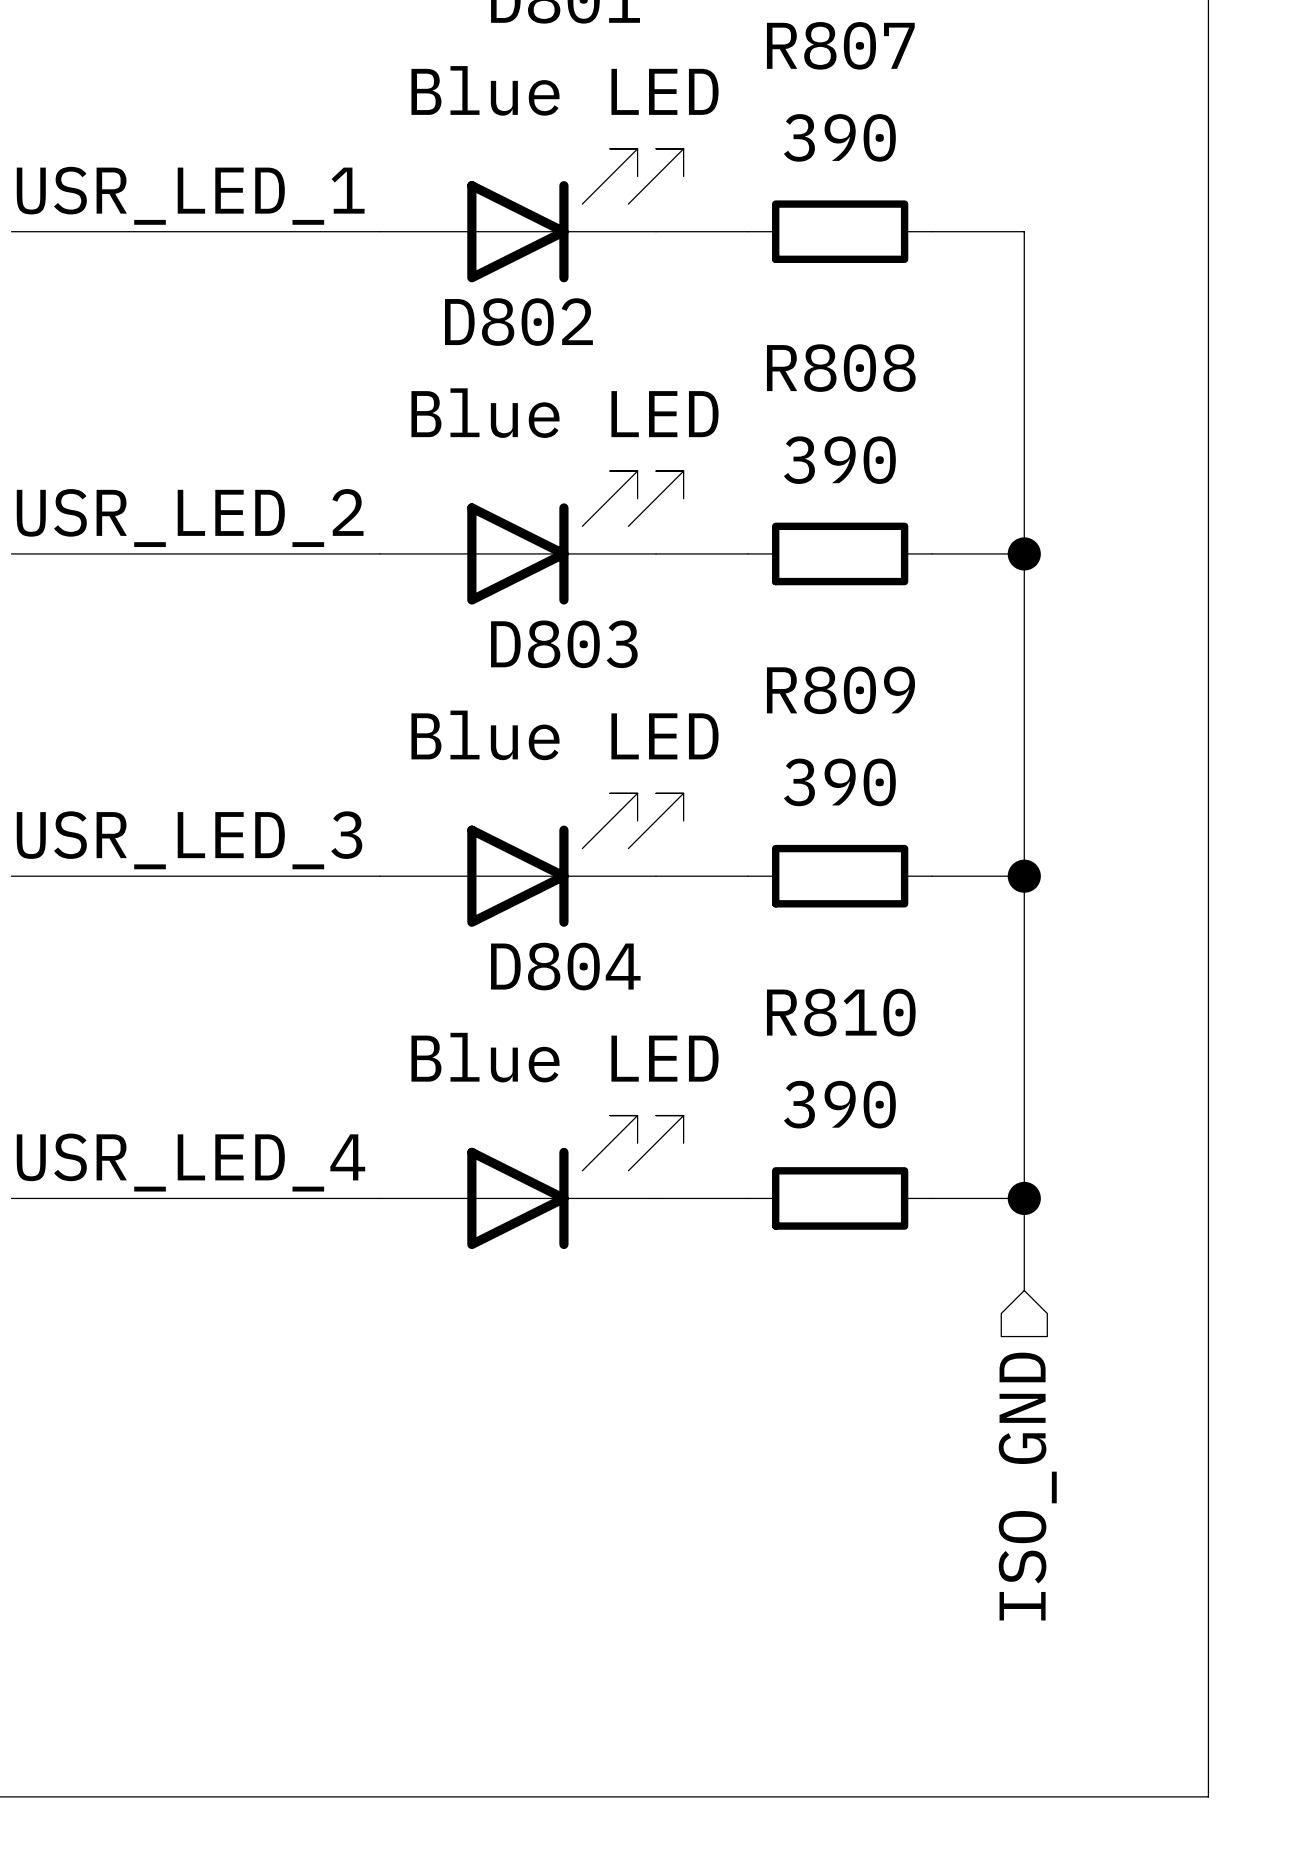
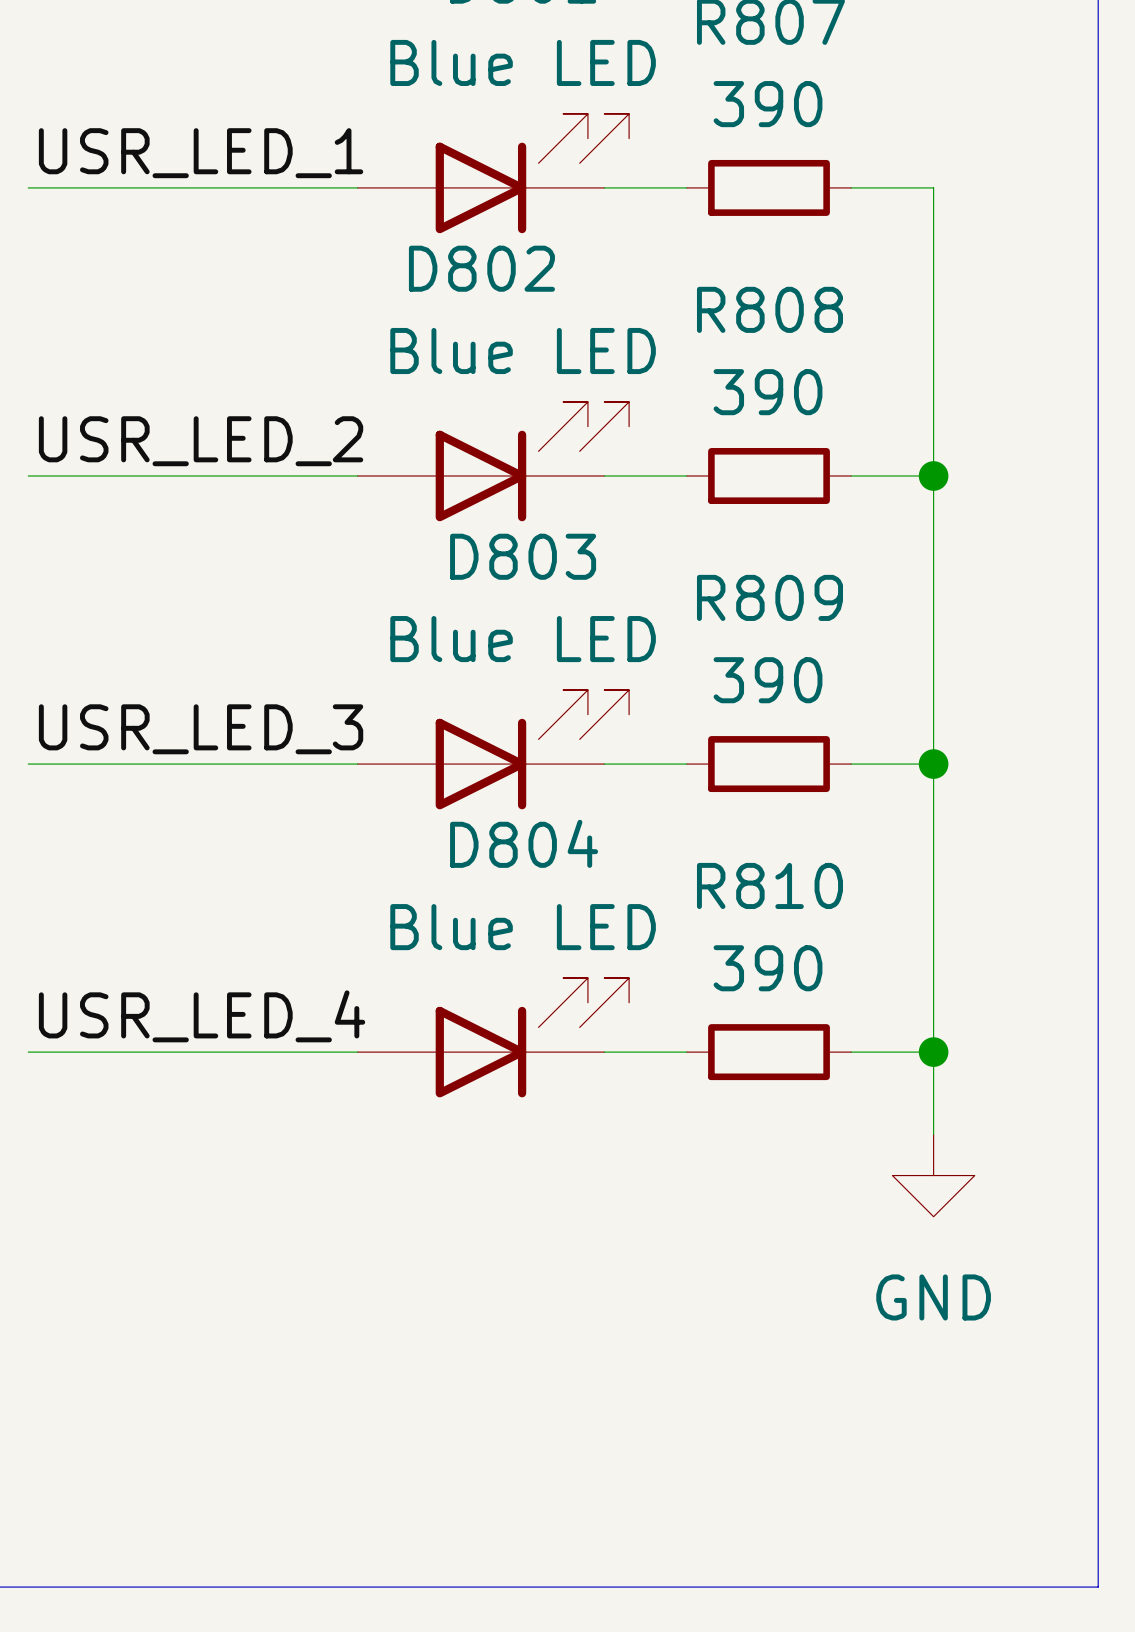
power symbol: none -> GND (933, 1175)
hierarchical label: ISO_GND (1027, 1486) -> none

